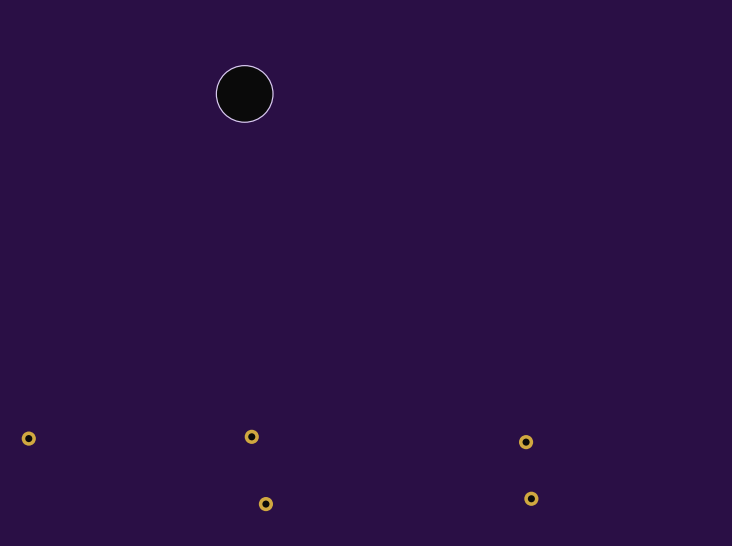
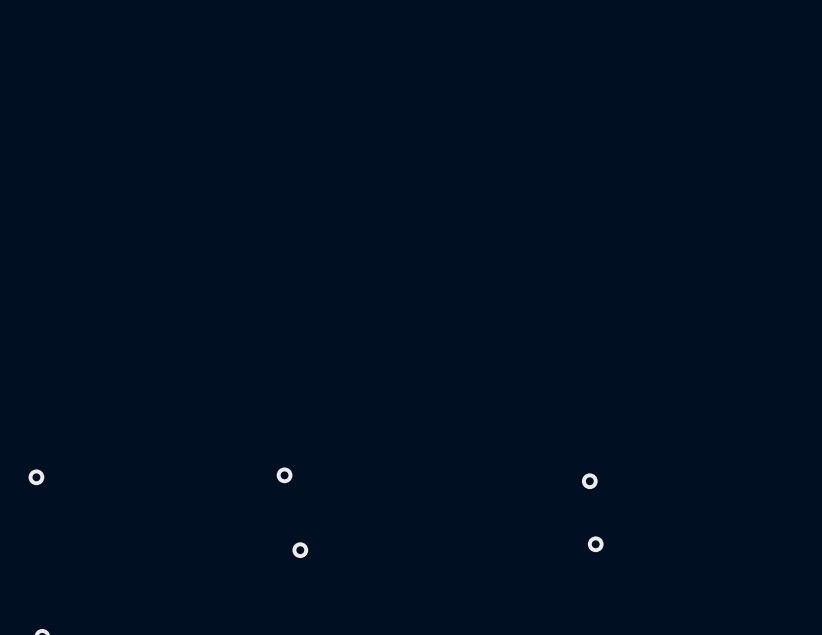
part: (244, 93) -> none

